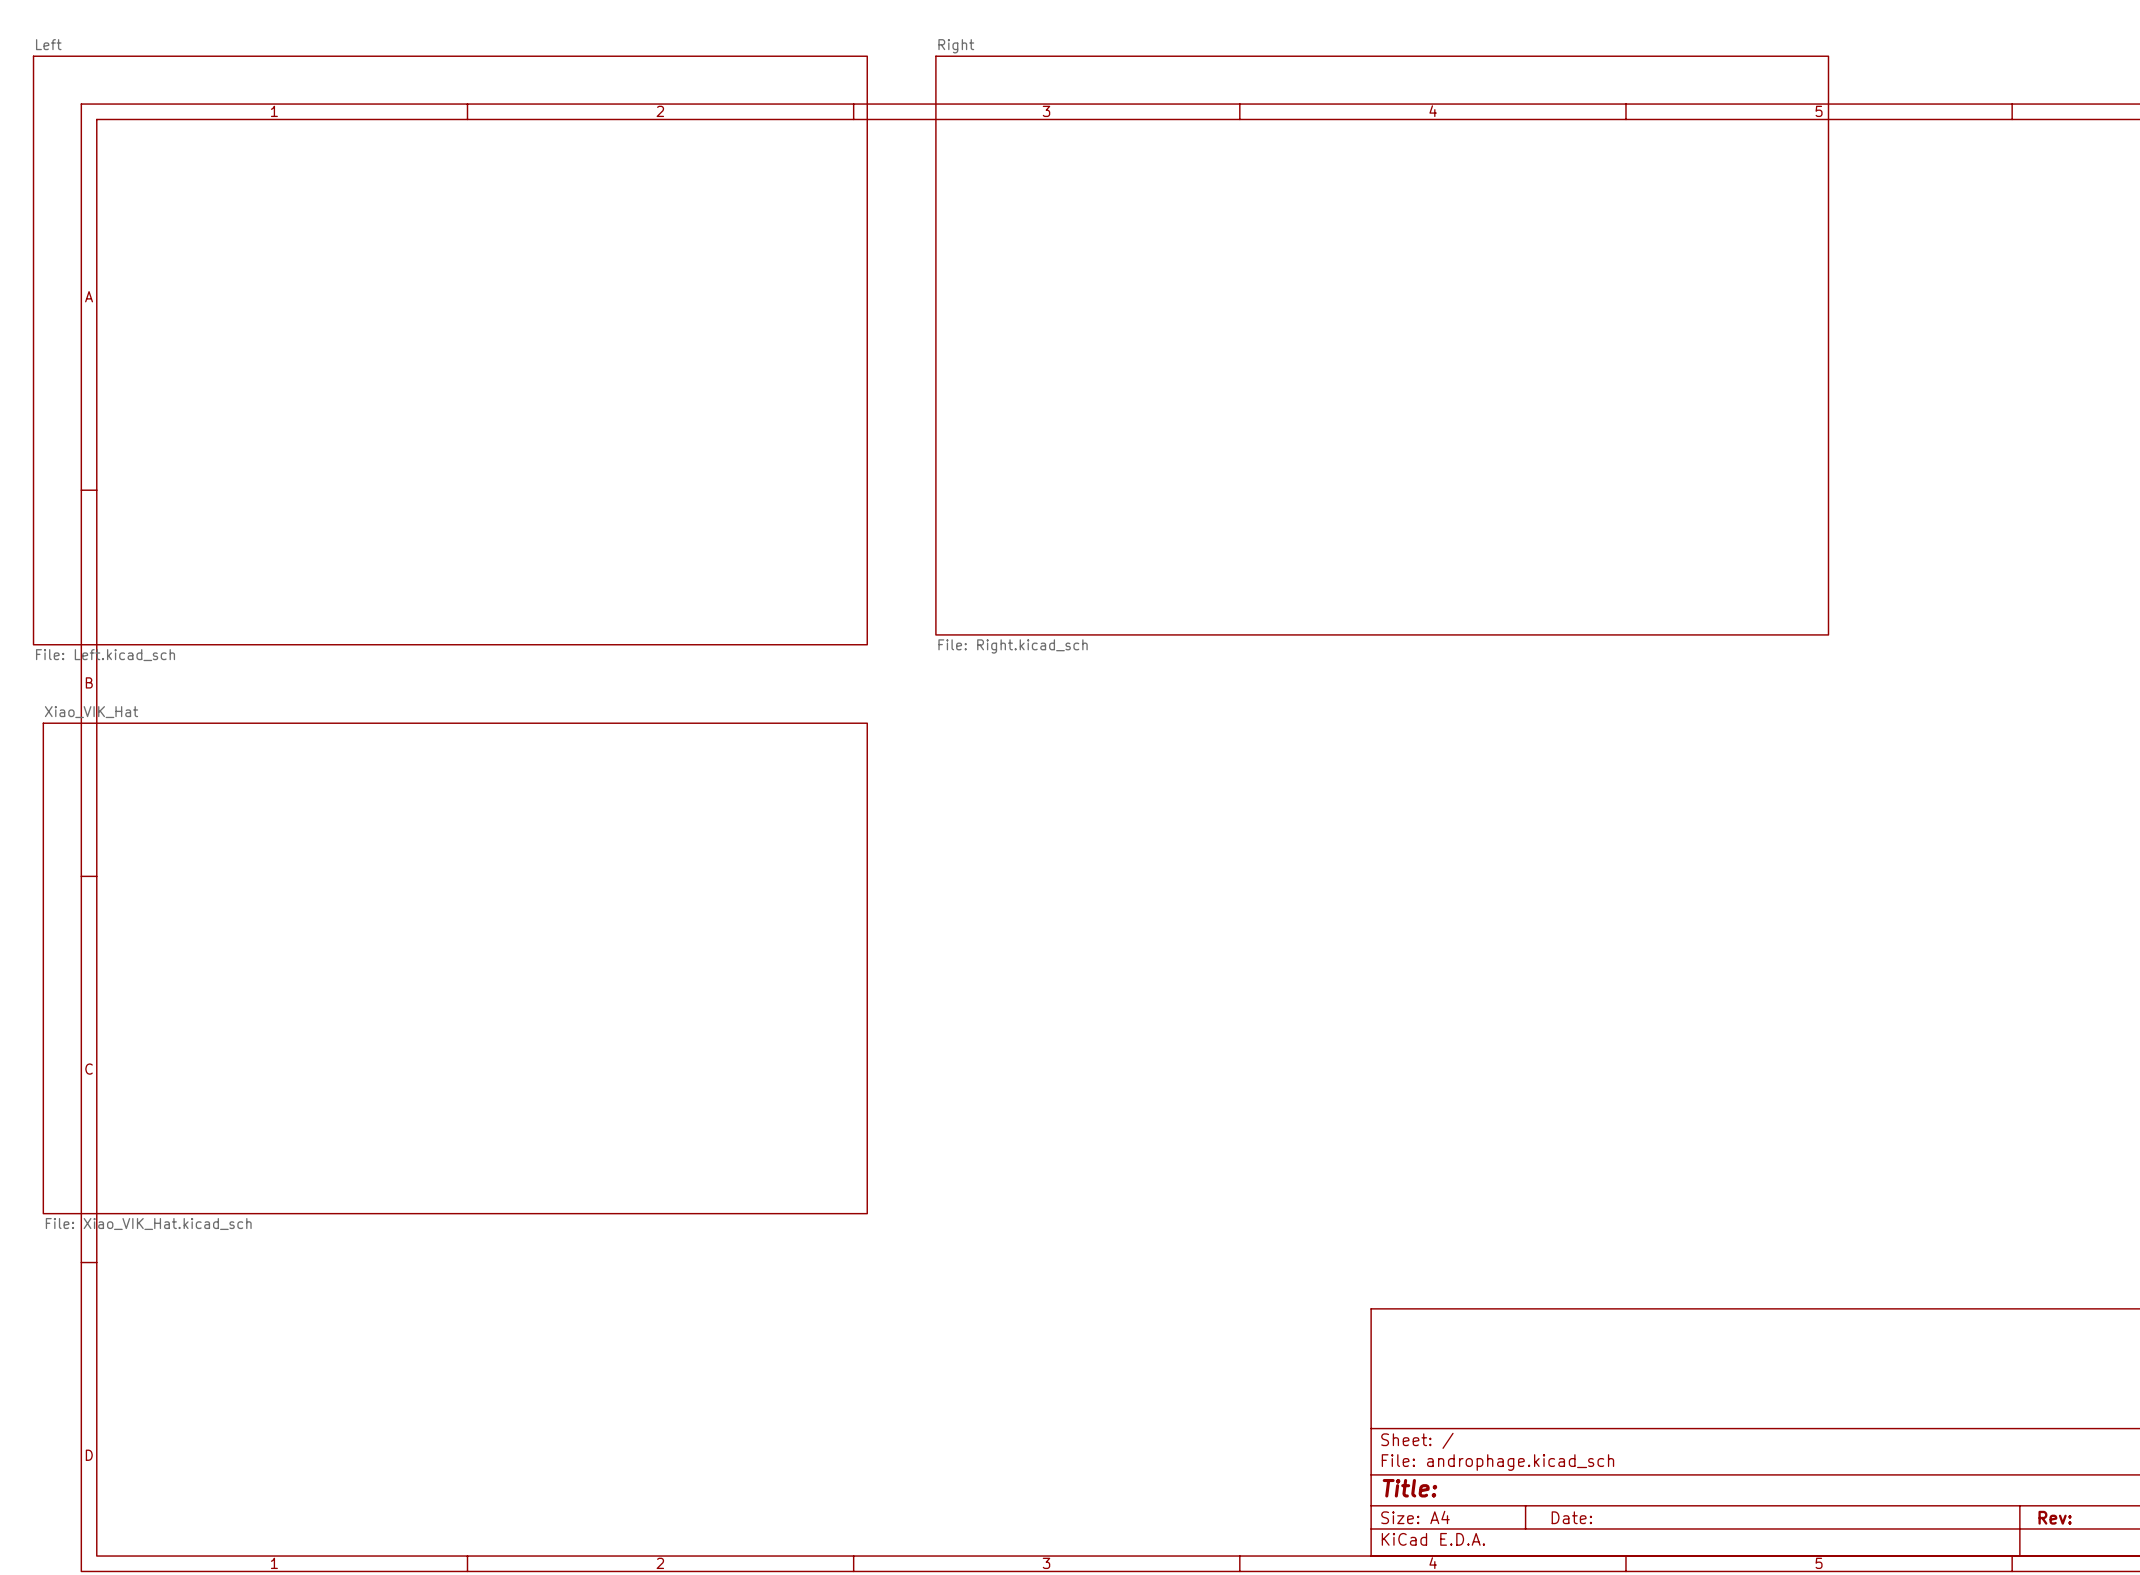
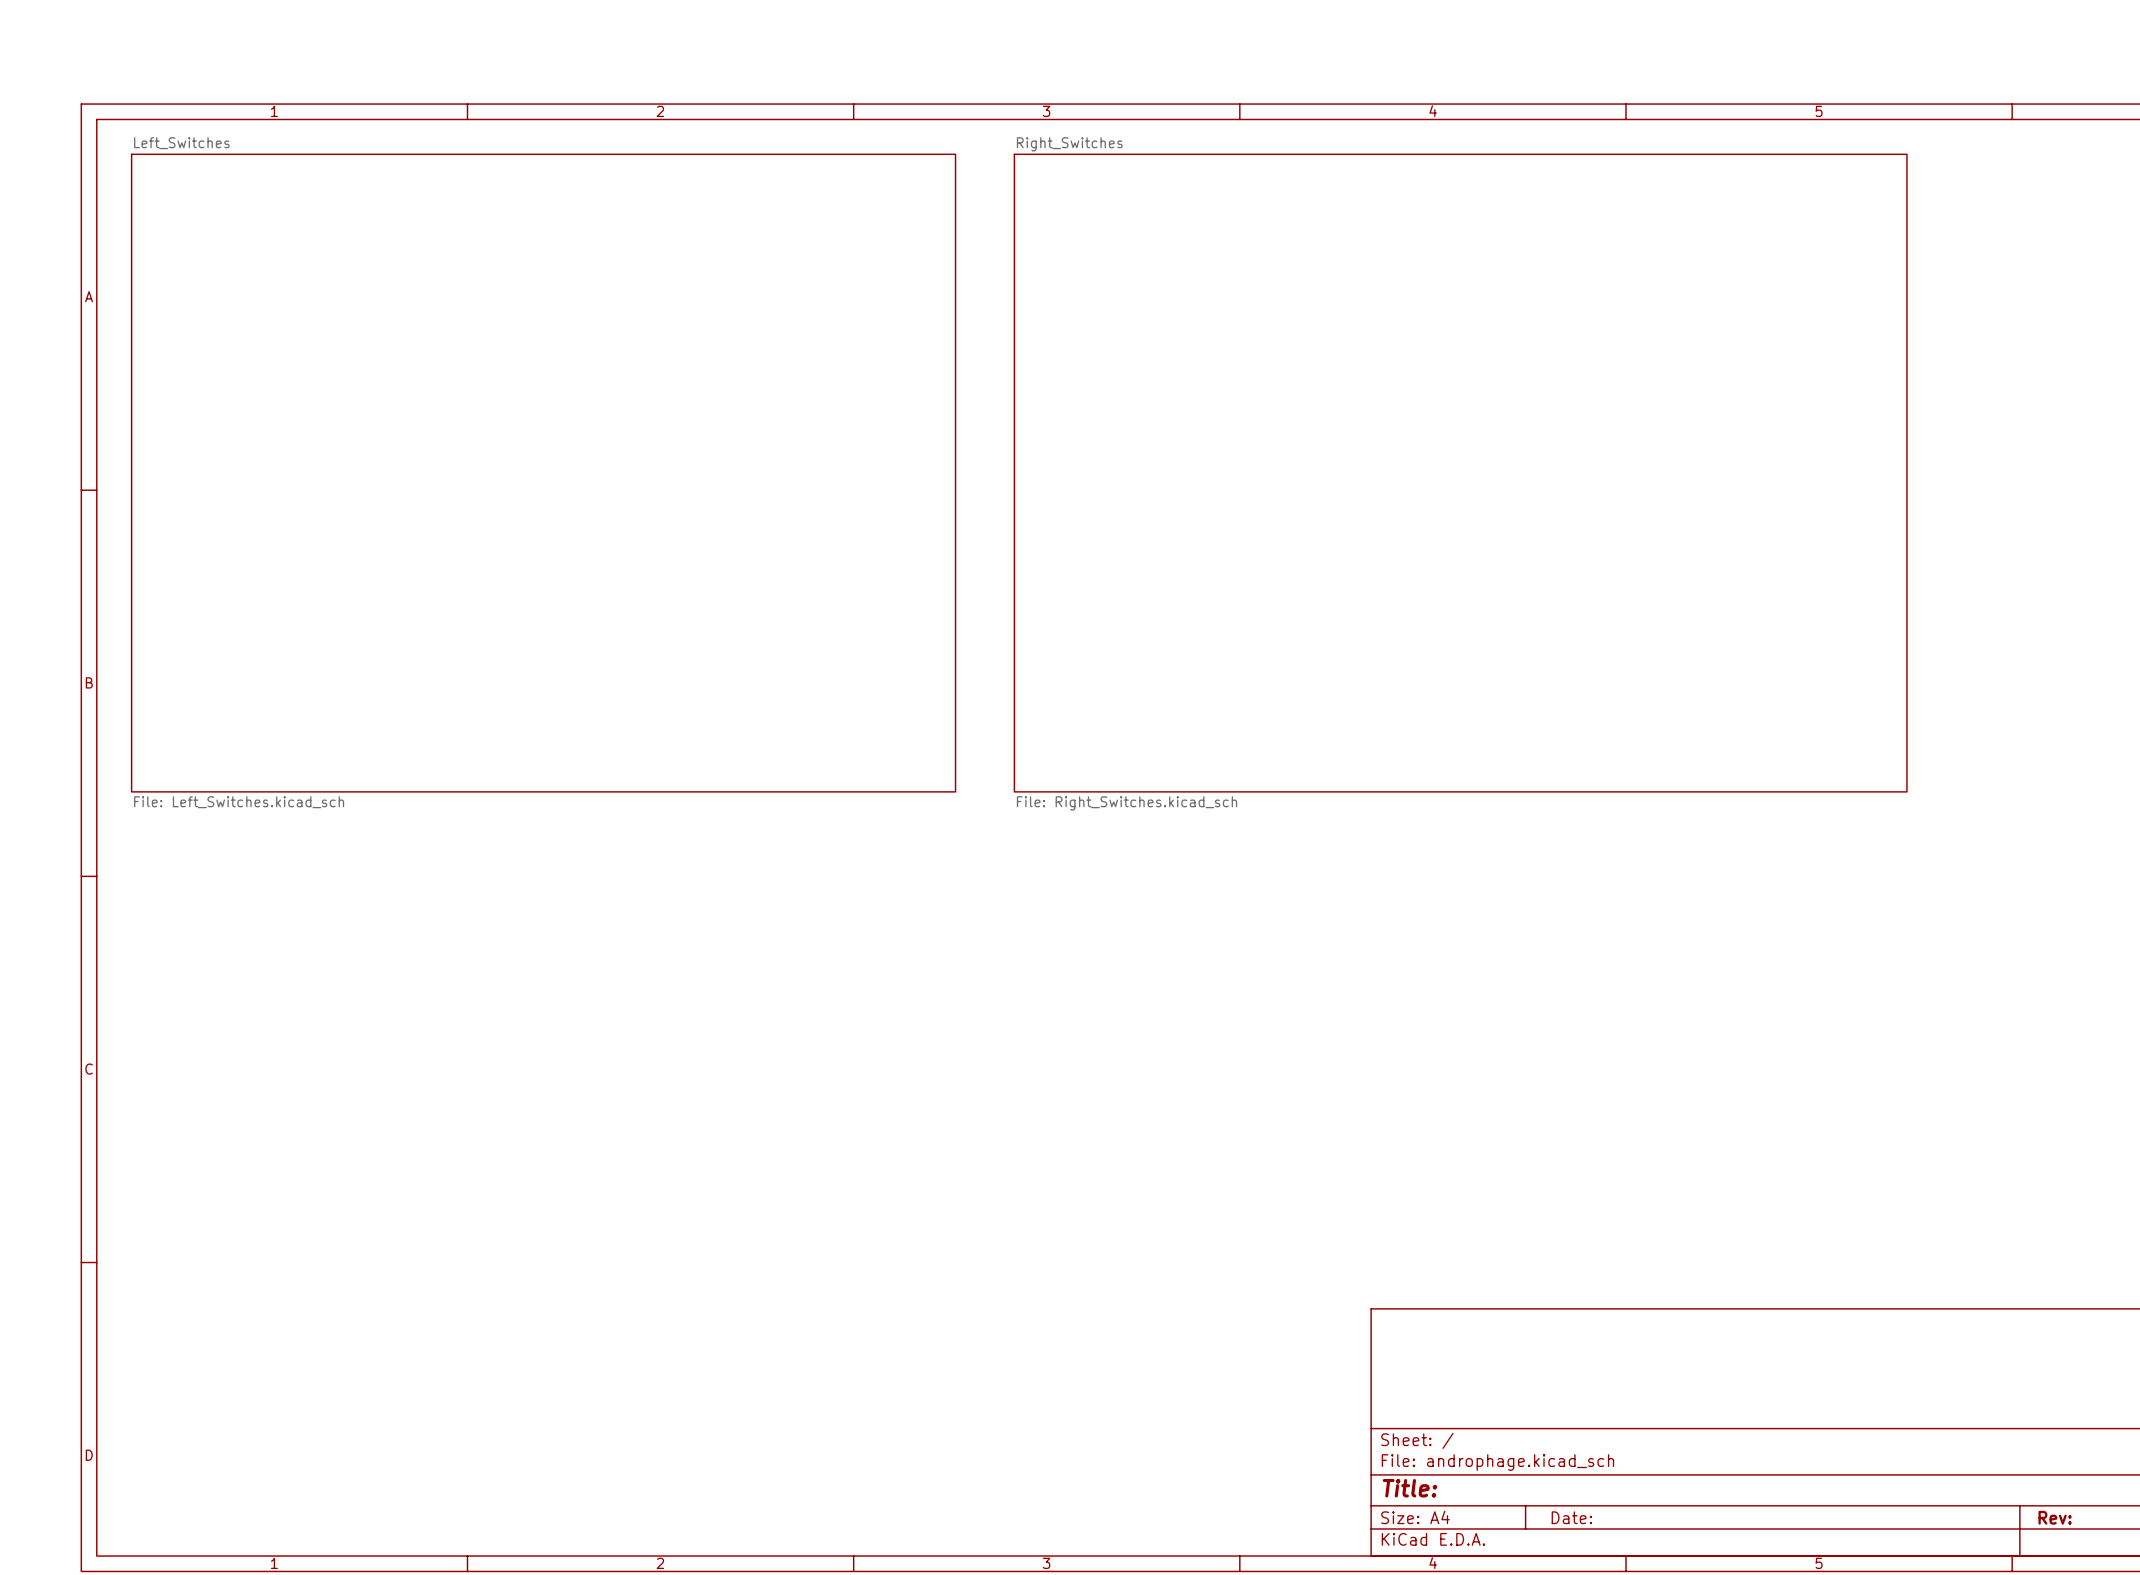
sheet Right: File: Right.kicad_sch (1382, 345) -> none
sheet Left: File: Left.kicad_sch (450, 350) -> none
sheet Left_Switches: none -> File: Left_Switches.kicad_sch (543, 473)
sheet Right_Switches: none -> File: Right_Switches.kicad_sch (1460, 473)
sheet Xiao_VIK_Hat: File: Xiao_VIK_Hat.kicad_sch (455, 968) -> none

